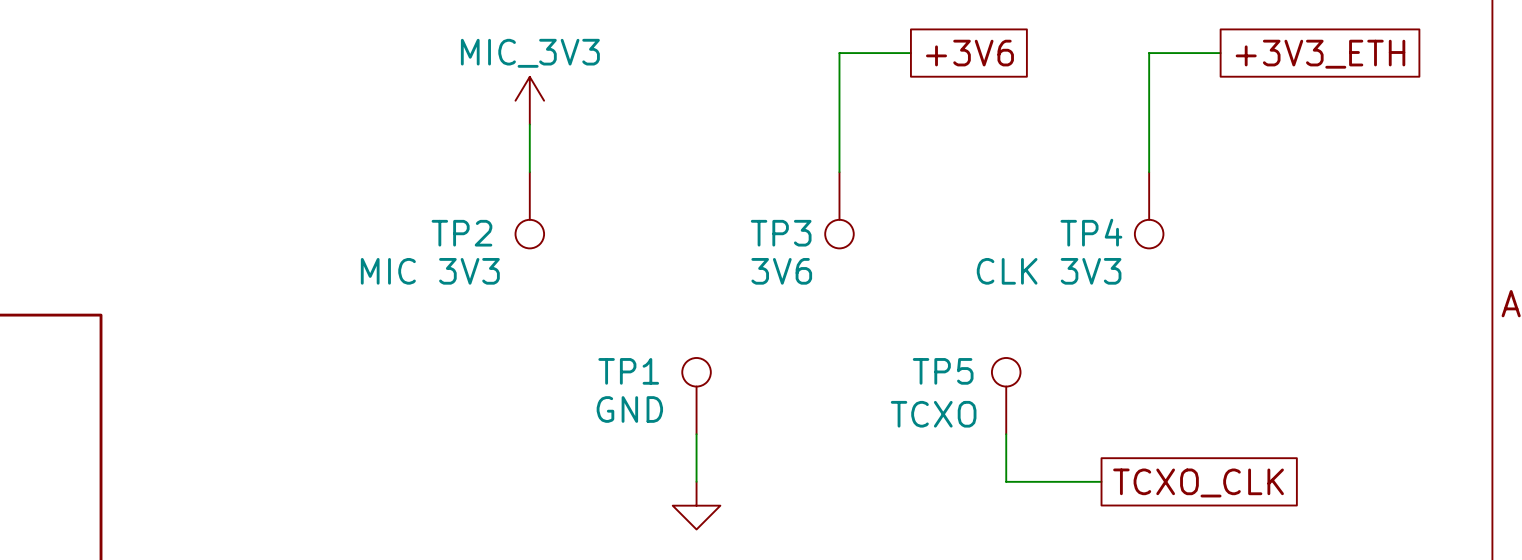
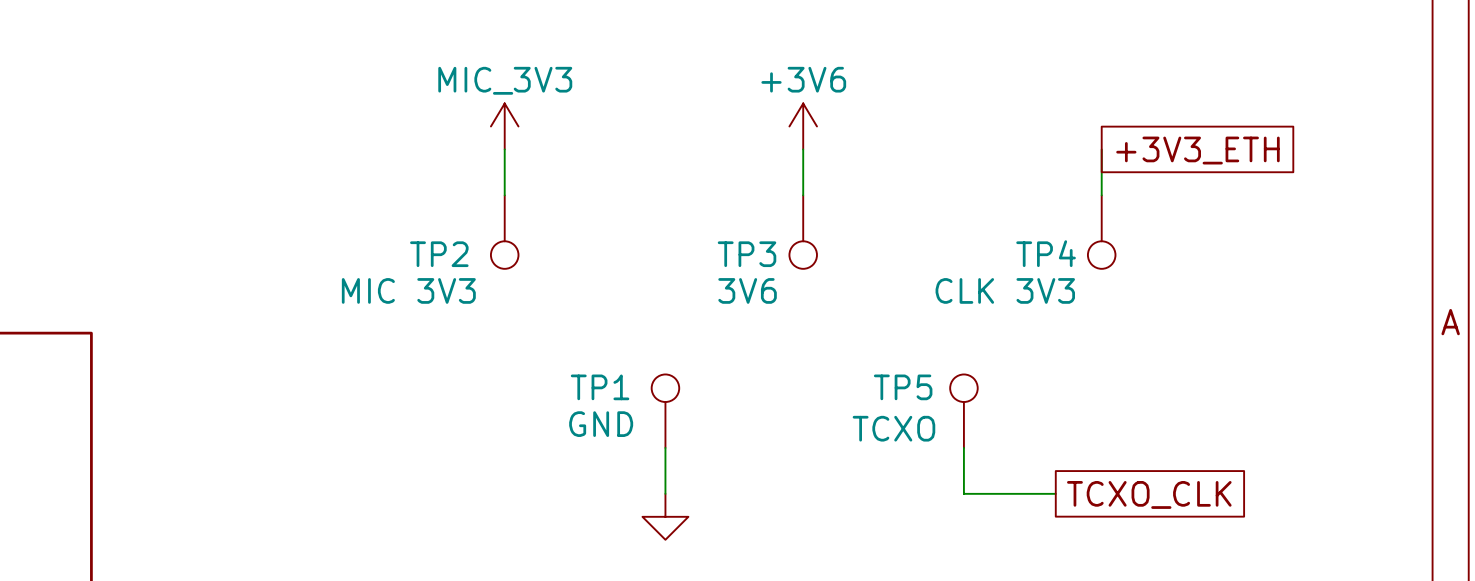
wire: (910, 53) (839, 53) (839, 124) -> none
global label: +3V6 (969, 53) -> none
wire: (1220, 53) (1149, 53) (1149, 124) -> none
global label position: +3V3_ETH (1320, 54) -> +3V3_ETH (1197, 150)
power symbol: none -> +3V6 (803, 126)

